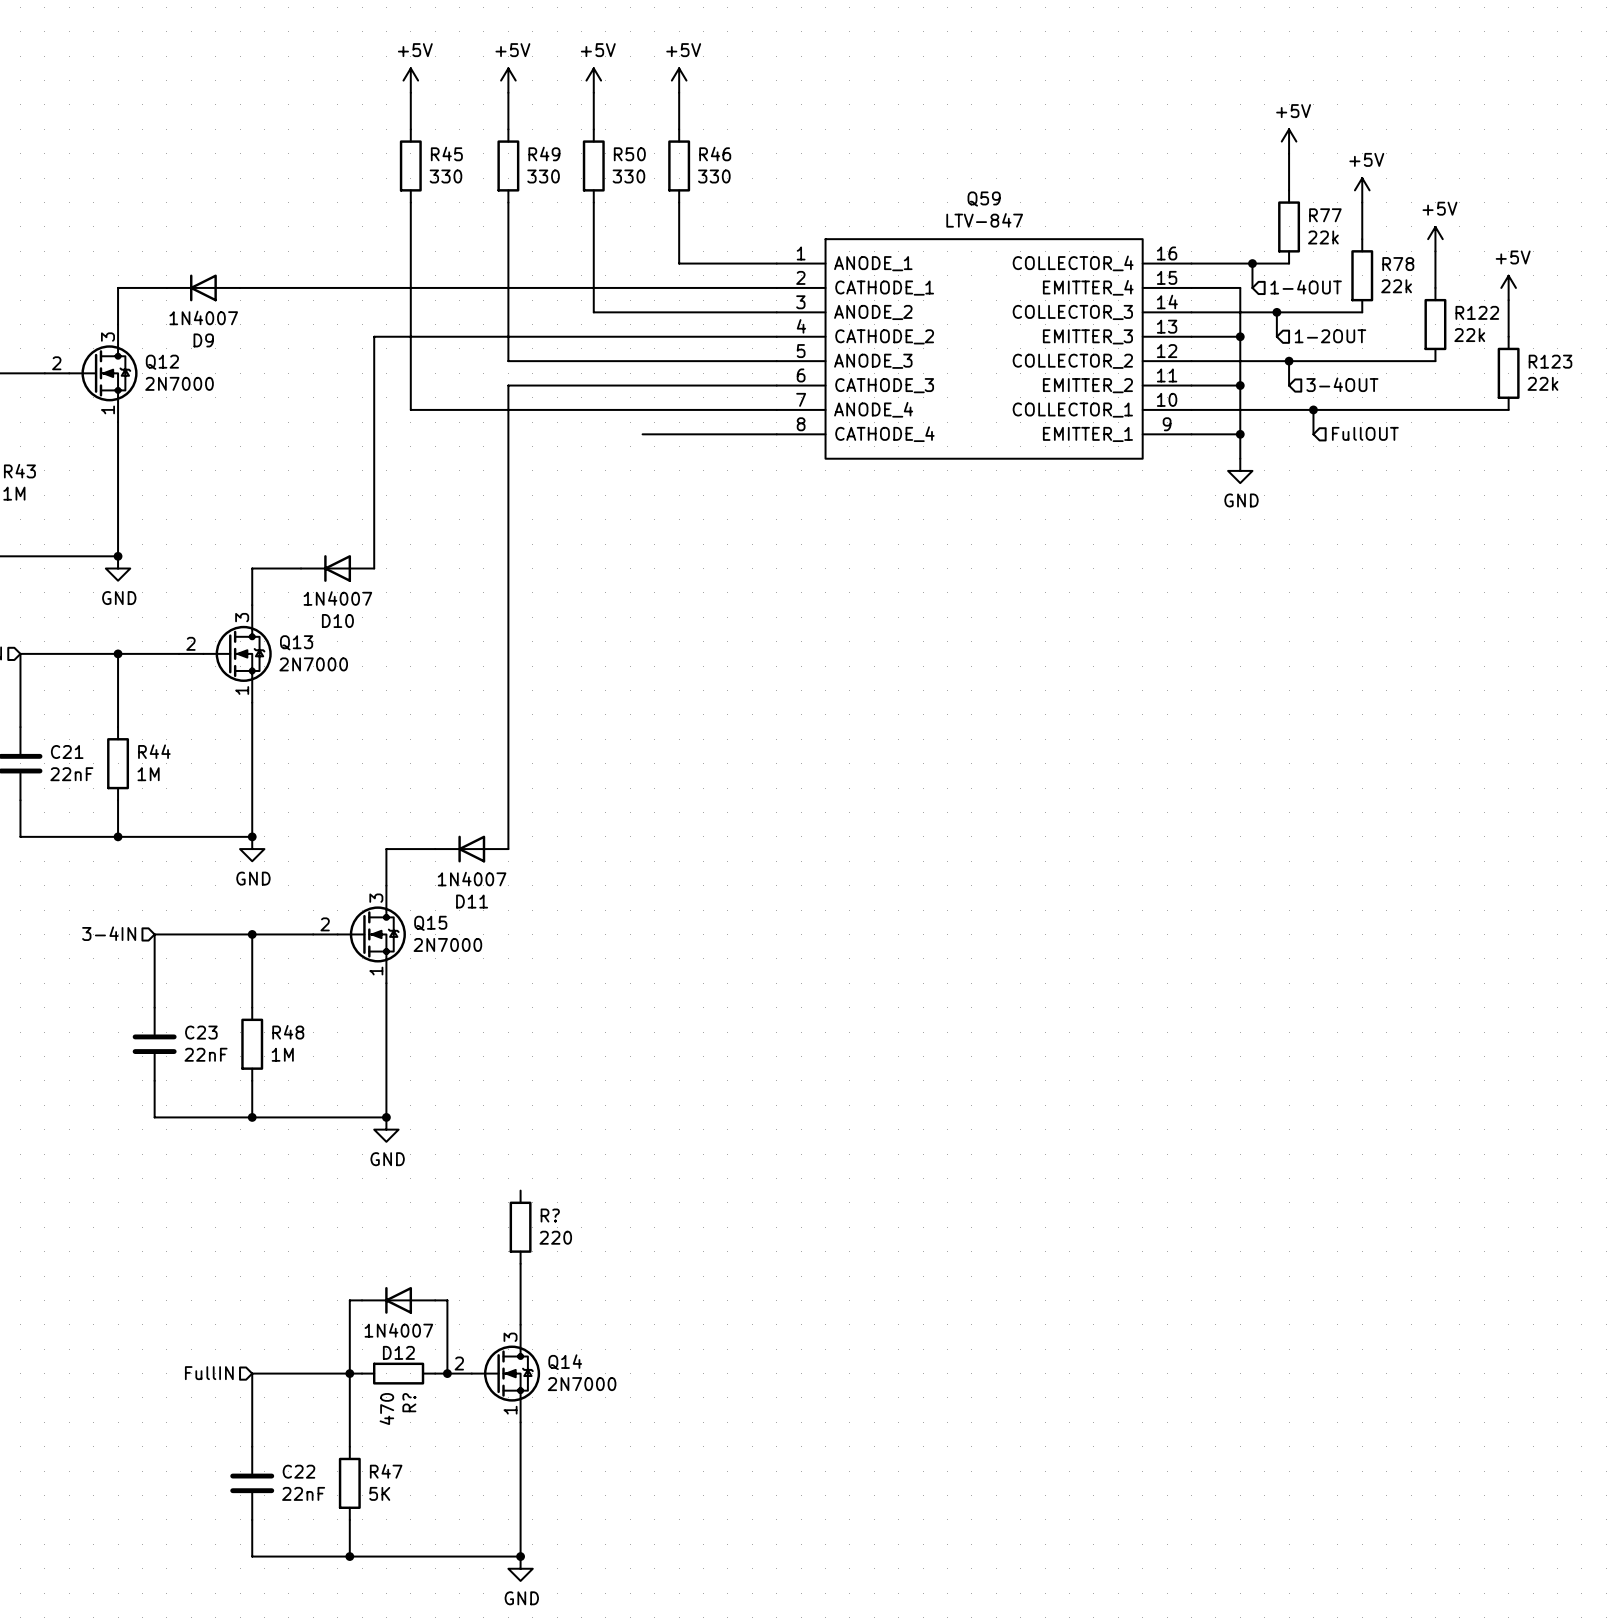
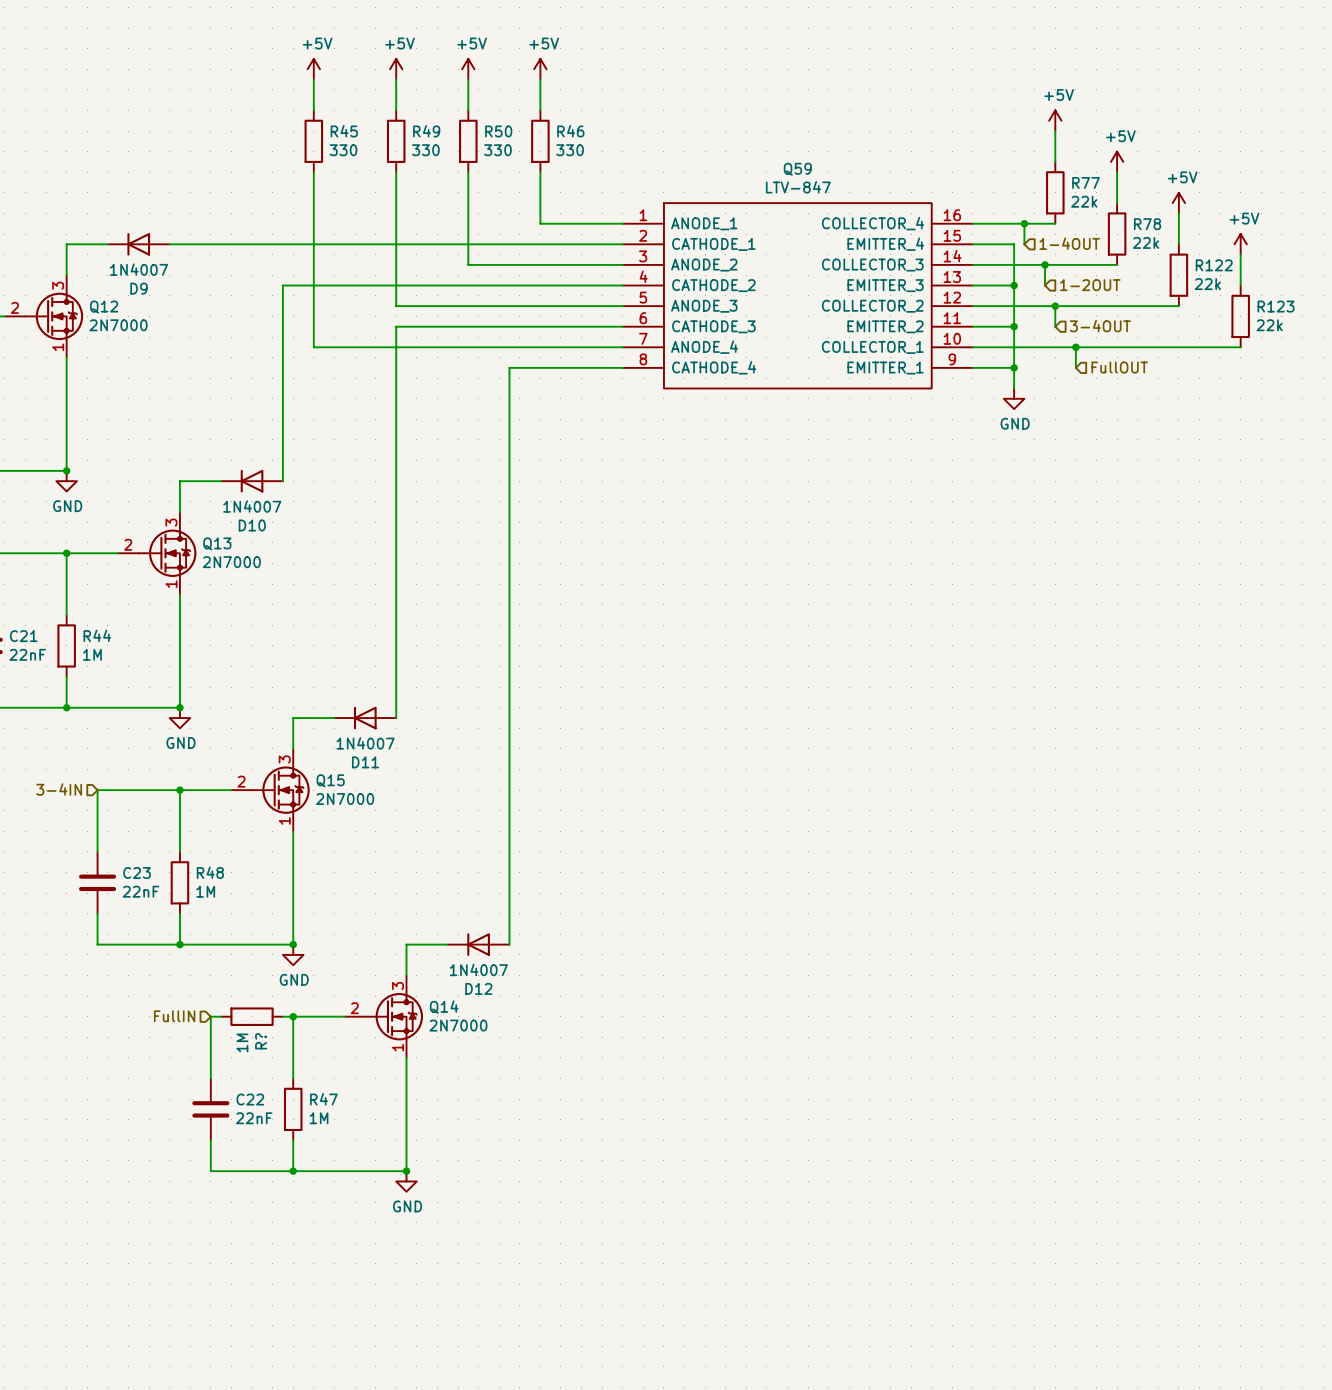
wire: none -> (509, 367) (509, 944)
wire: none -> (447, 944) (406, 944) (406, 975)
wire: none -> (221, 1016) (210, 1016) (210, 1078)
R?: none -> 1M (252, 1016)
wire: none -> (282, 1016) (344, 1016)
wire: none -> (293, 1016) (293, 1078)
junction: none -> (293, 1016)
R?: 220 (520, 1227) -> none
wire: (362, 1300) (349, 1300) (349, 1446) -> none
D12 position: (398, 1300) -> (478, 944)
wire: (435, 1300) (447, 1300) (447, 1373) (435, 1373) -> none
wire: none -> (406, 1119) (406, 1171) (210, 1171) (210, 1140)
hierarchical label position: FullIN (209, 1373) -> FullIN (174, 1016)
junction: (349, 1373) -> none
wire: (362, 1373) (252, 1373) (252, 1446) -> none
R?: 470 (398, 1373) -> none
junction: (447, 1373) -> none
Q14 position: (493, 1373) -> (383, 1016)
junction: none -> (293, 1171)
junction: none -> (406, 1171)
wire: (520, 1422) (520, 1556) (252, 1556) (252, 1519) -> none
C22 position: (252, 1483) -> (210, 1109)
R47 position: (349, 1483) -> (293, 1109)
R47 value: 5K (379, 1493) -> 1M (319, 1118)
wire: (349, 1519) (349, 1556) -> (293, 1140) (293, 1171)
junction: (349, 1556) -> none
junction: (520, 1556) -> none
power symbol position: GND (520, 1568) -> GND (406, 1181)

